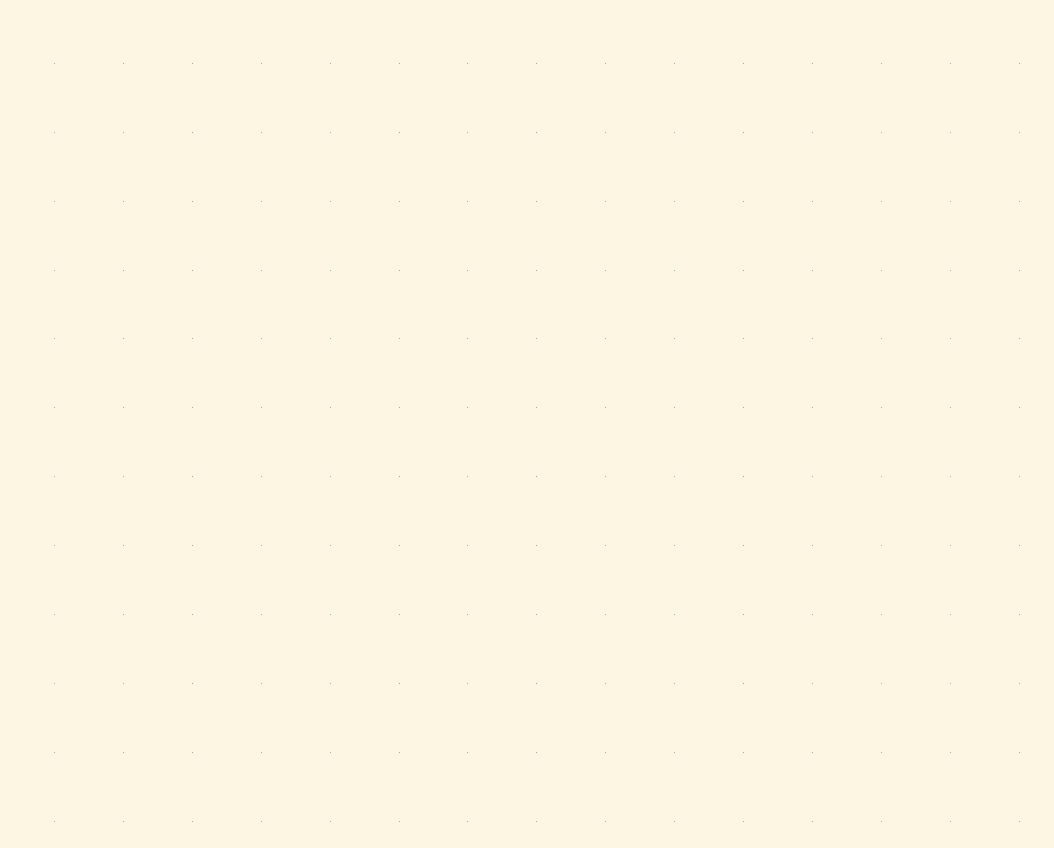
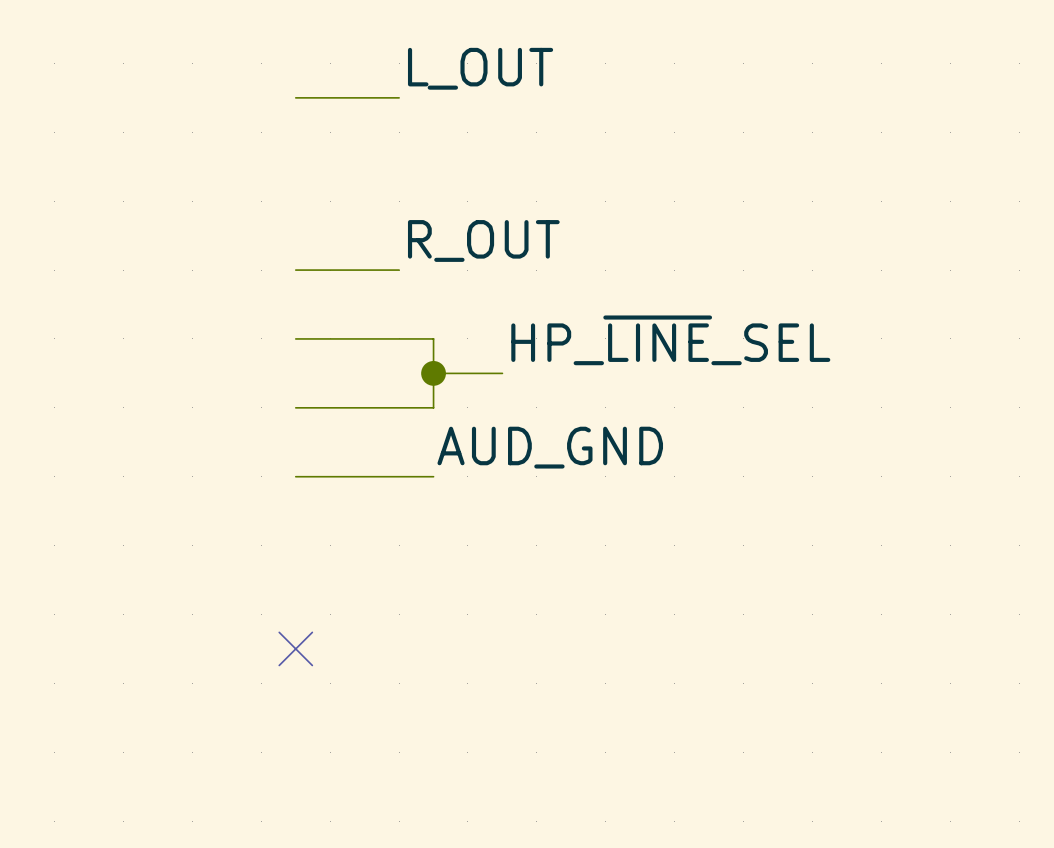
label: none -> L_OUT (480, 68)
wire: none -> (295, 97) (399, 97)
label: none -> R_OUT (483, 240)
wire: none -> (295, 270) (399, 270)
wire: none -> (295, 338) (433, 338) (433, 407) (295, 407)
label: none -> HP_~{LINE}_SEL (670, 340)
wire: none -> (433, 373) (502, 373)
junction: none -> (433, 373)
label: none -> AUD_GND (550, 447)
wire: none -> (295, 476) (433, 476)
no-connect mark: none -> (295, 648)

